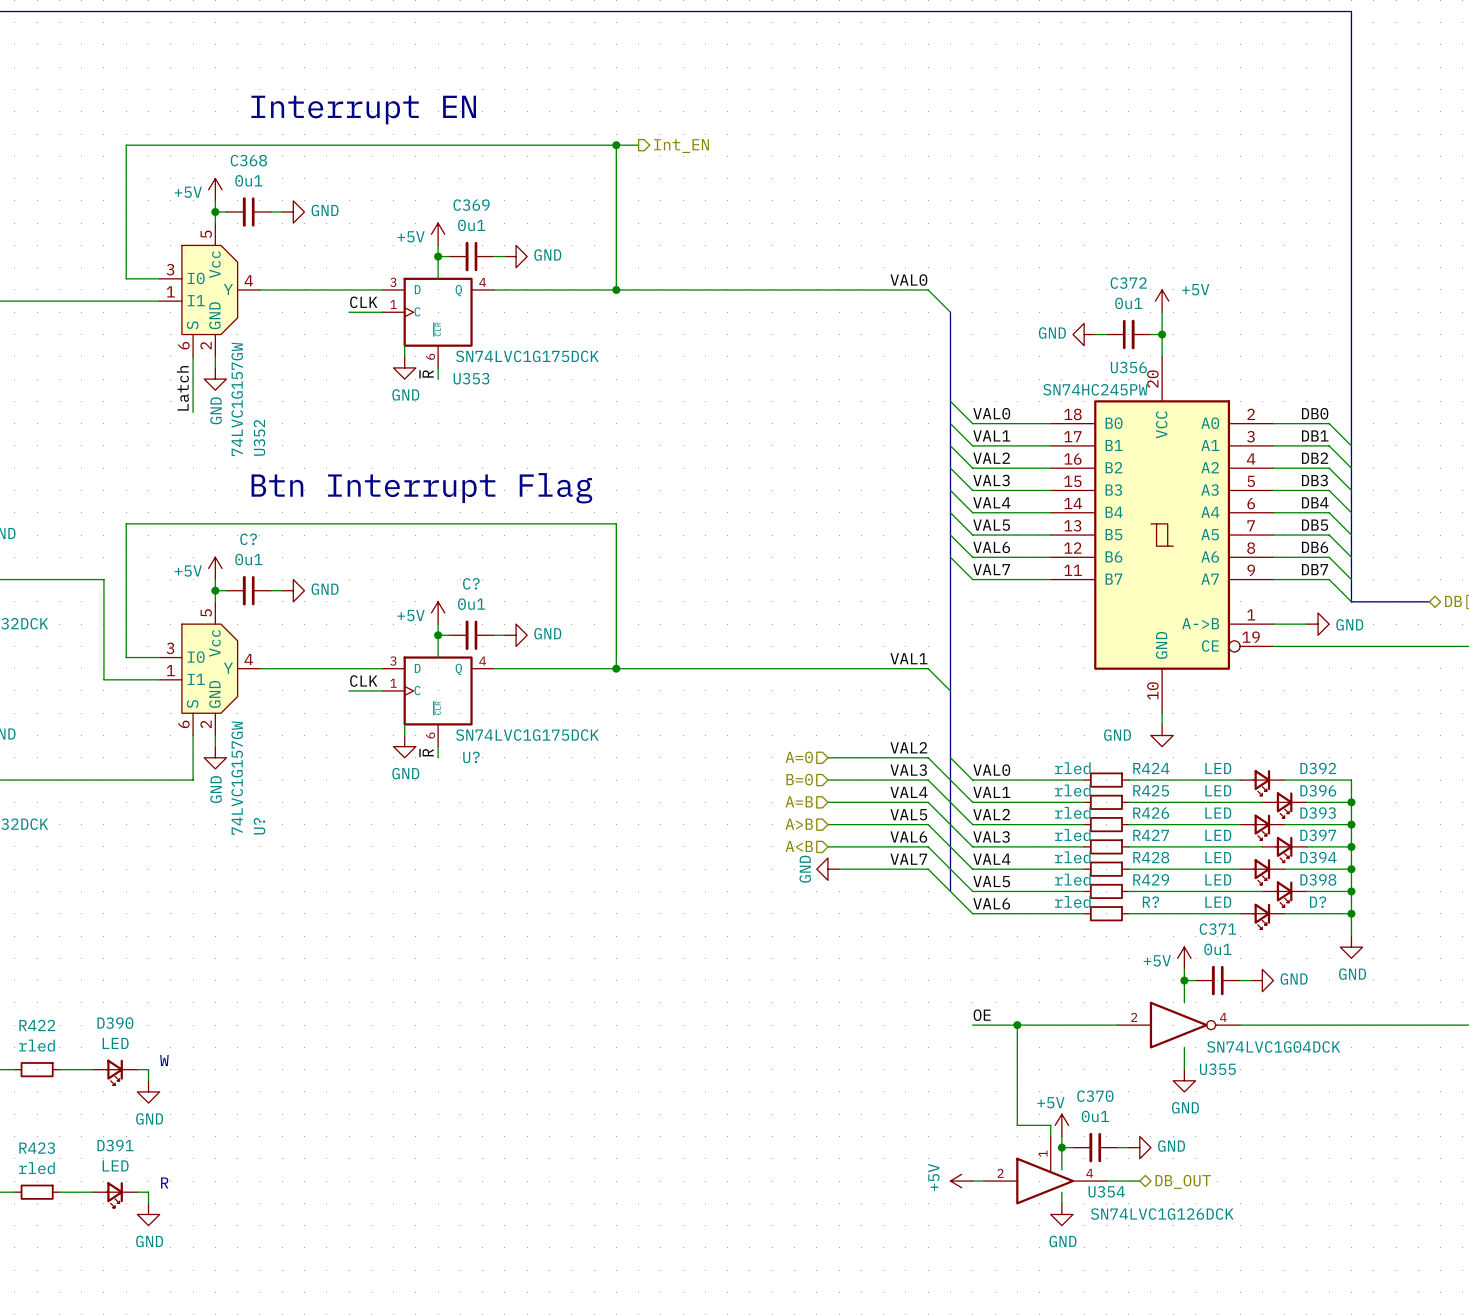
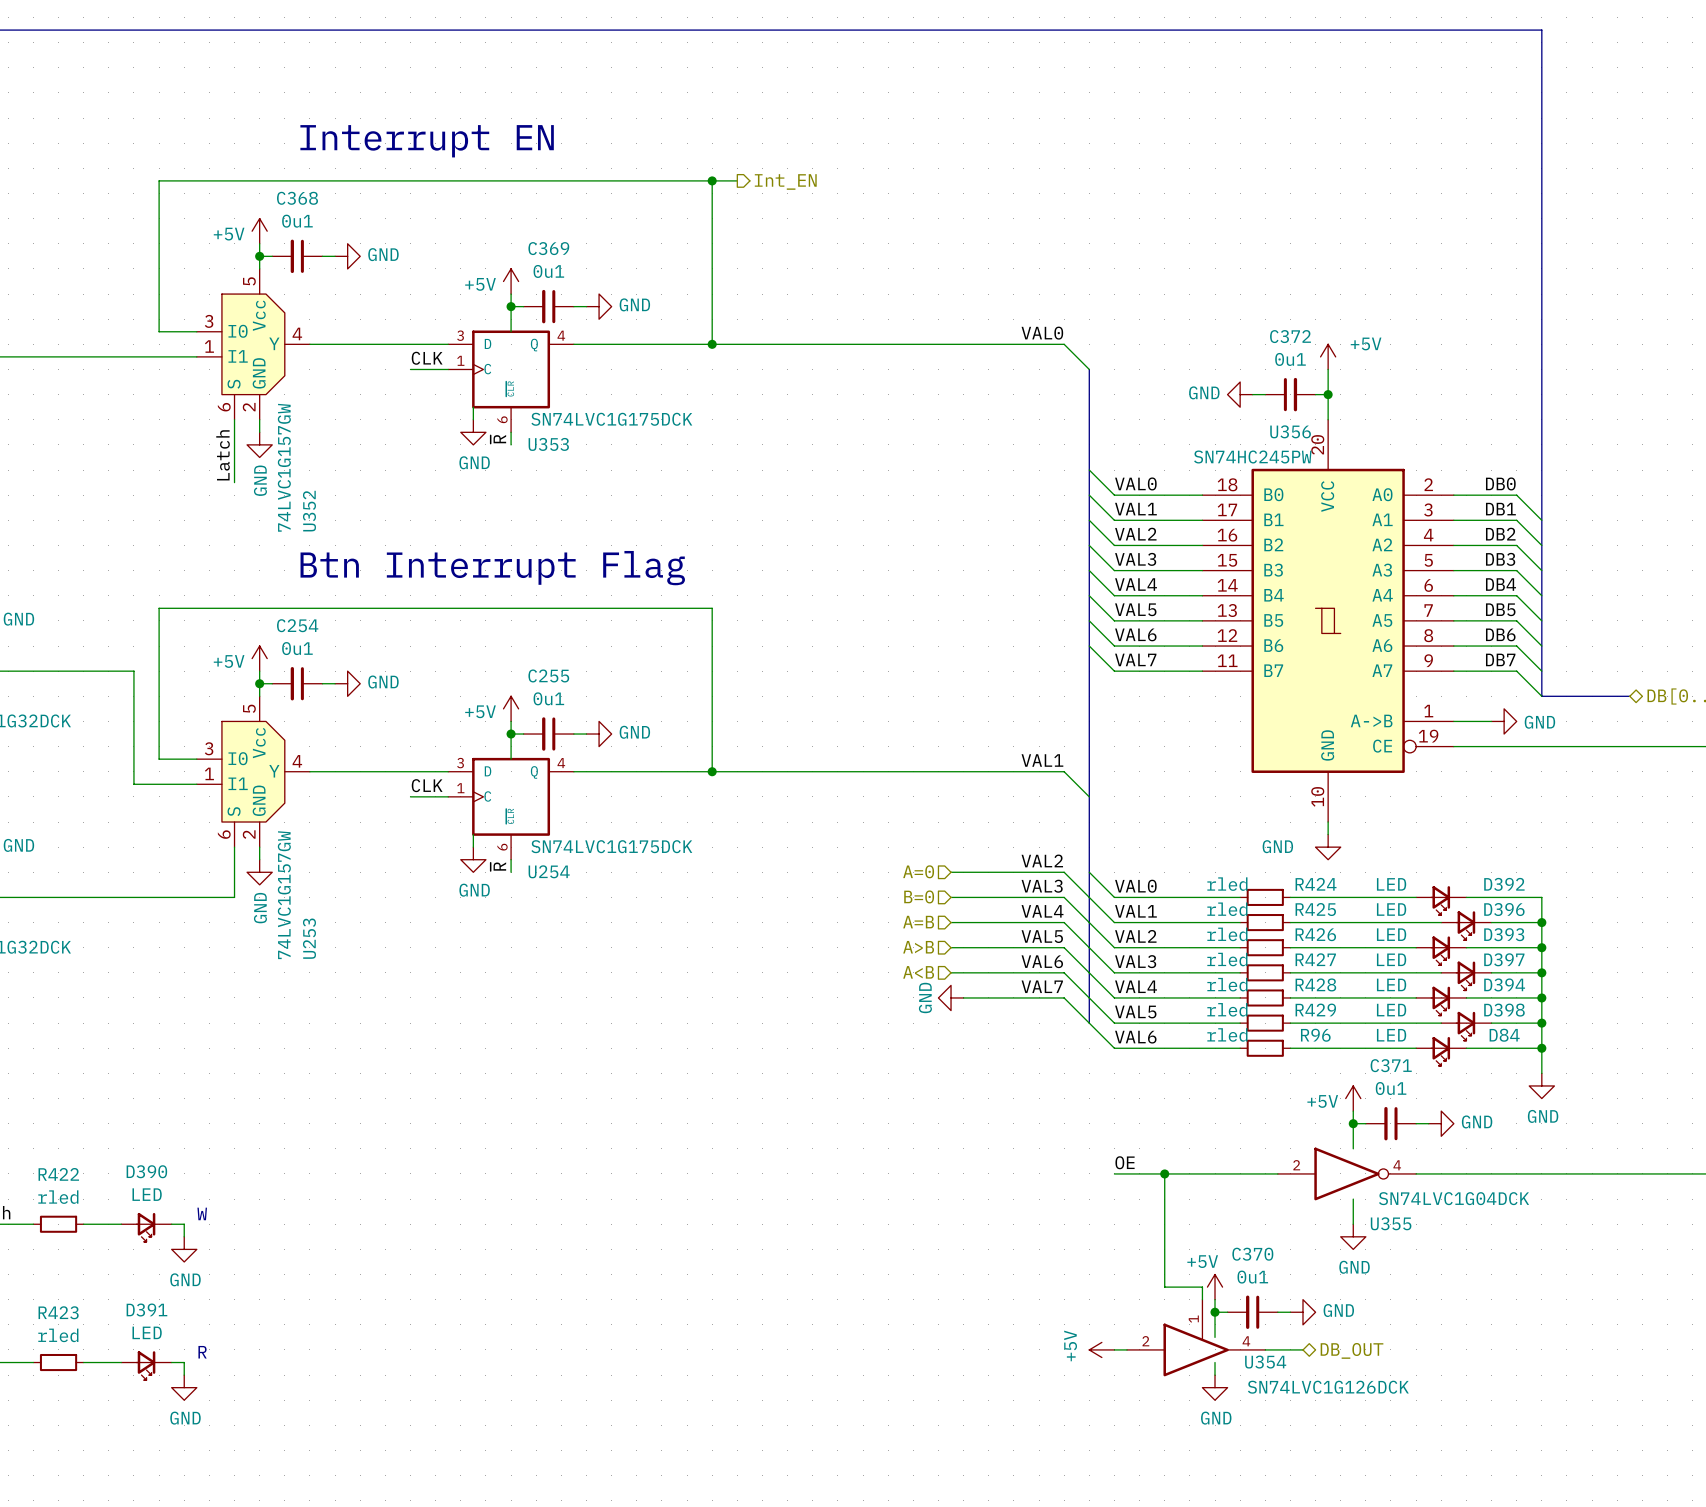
C? name: C? (248, 539) -> C254 (297, 625)
C? name: C? (471, 583) -> C255 (548, 675)
U? name: U? (471, 757) -> U254 (549, 871)
U? name: U? (259, 826) -> U253 (309, 938)
R? name: R? (1150, 902) -> R96 (1315, 1035)
D? name: D? (1318, 902) -> D84 (1504, 1035)

